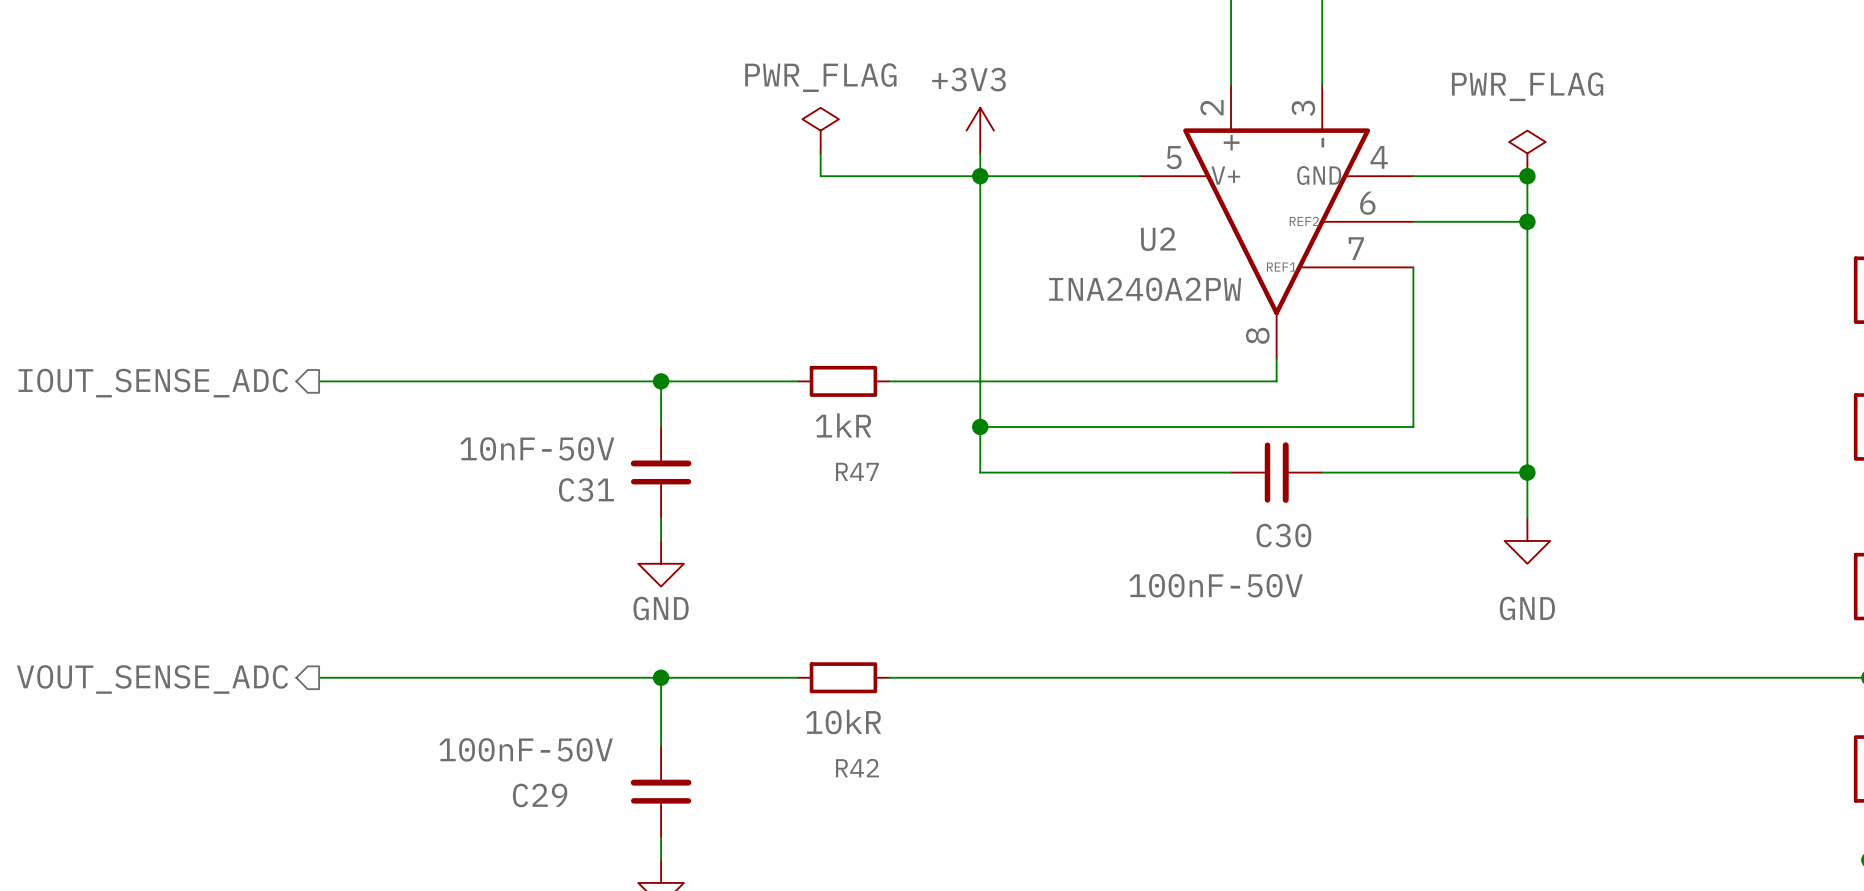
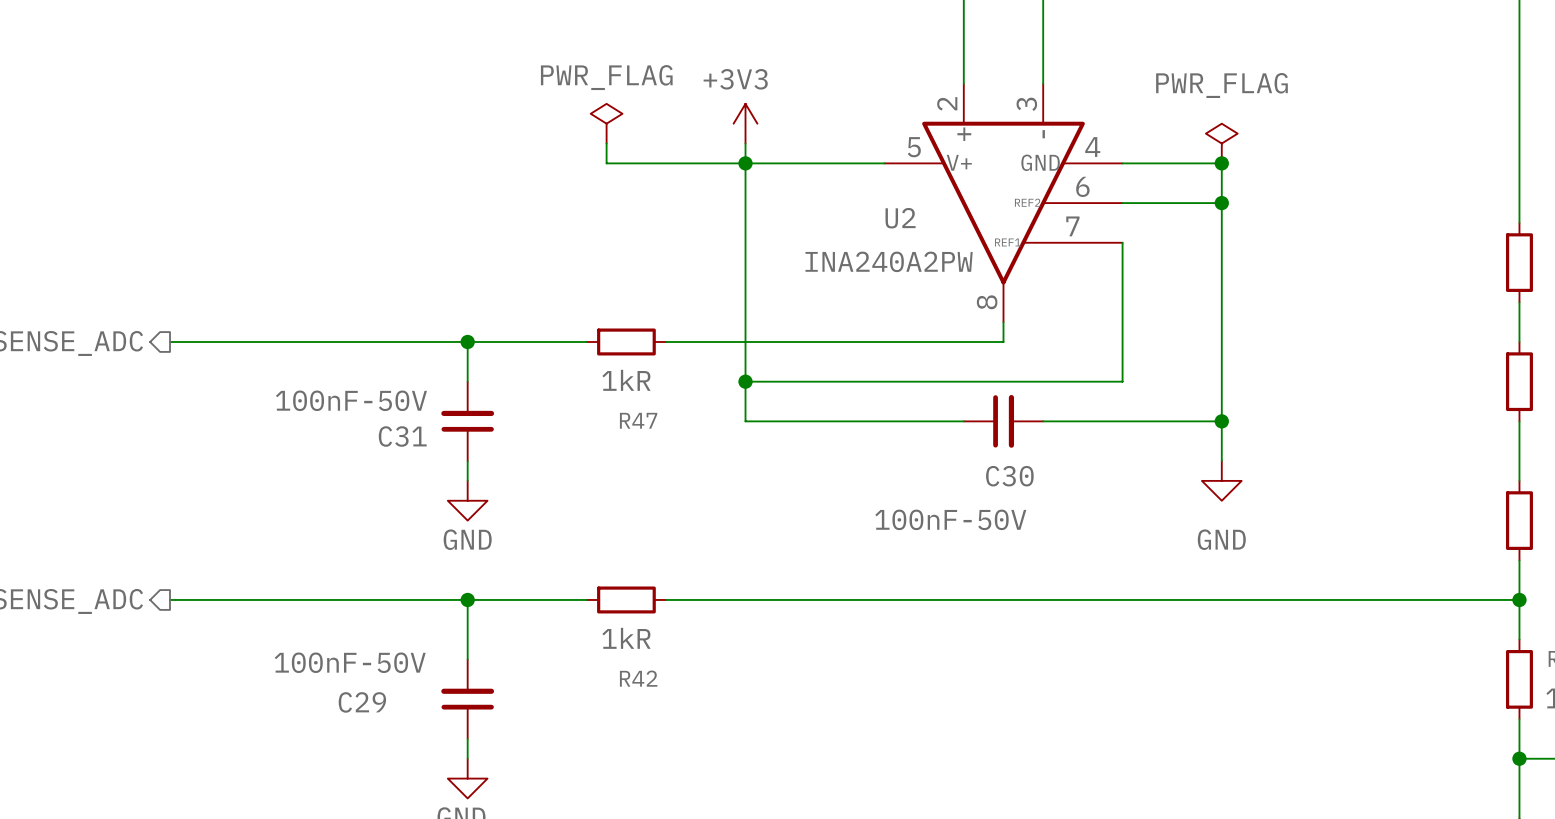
C31 value: 10nF-50V (537, 448) -> 100nF-50V (351, 400)
R42 value: 10kR (843, 722) -> 1kR (626, 638)

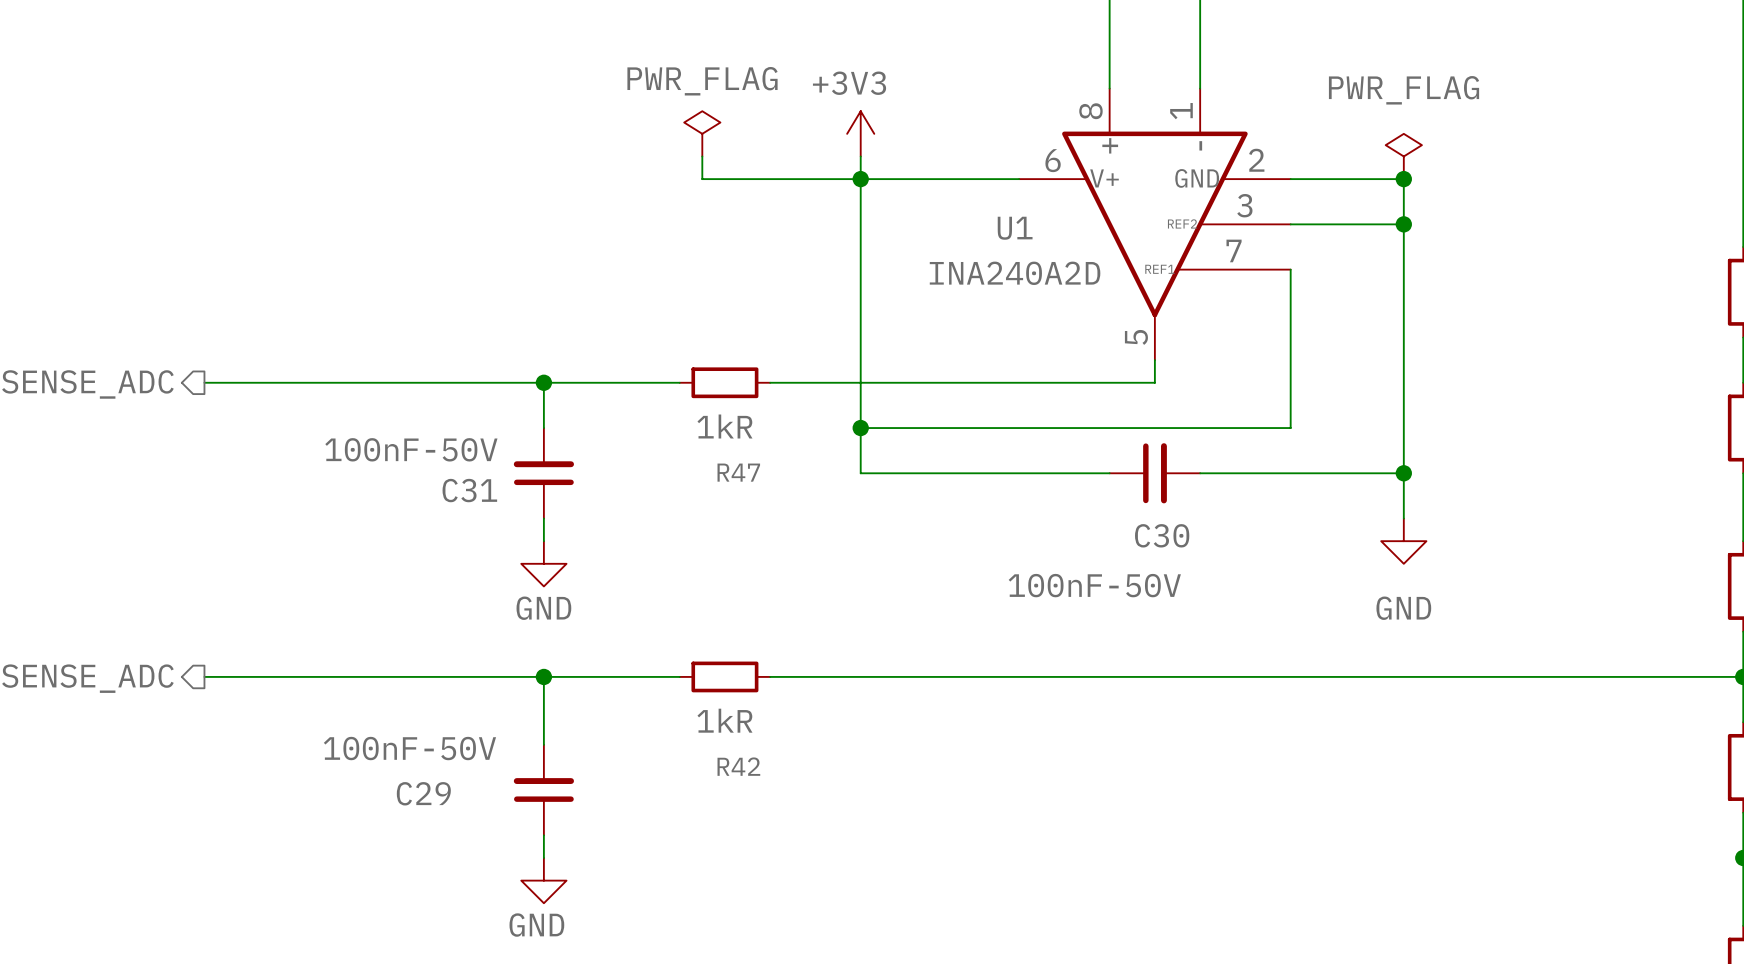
U2 pin number: 2 (947, 103) -> 8 (1090, 111)
U2 pin number: 3 (1026, 104) -> 1 (1181, 111)
U2 pin number: 5 (914, 147) -> 6 (1053, 160)
U2 pin number: 4 (1092, 147) -> 2 (1256, 160)
U2 pin number: 6 (1082, 186) -> 3 (1244, 205)
U2 name: U2 (900, 218) -> U1 (1015, 228)
U2 value: INA240A2PW (889, 261) -> INA240A2D (1015, 273)
U2 pin number: 8 (987, 302) -> 5 (1136, 337)

